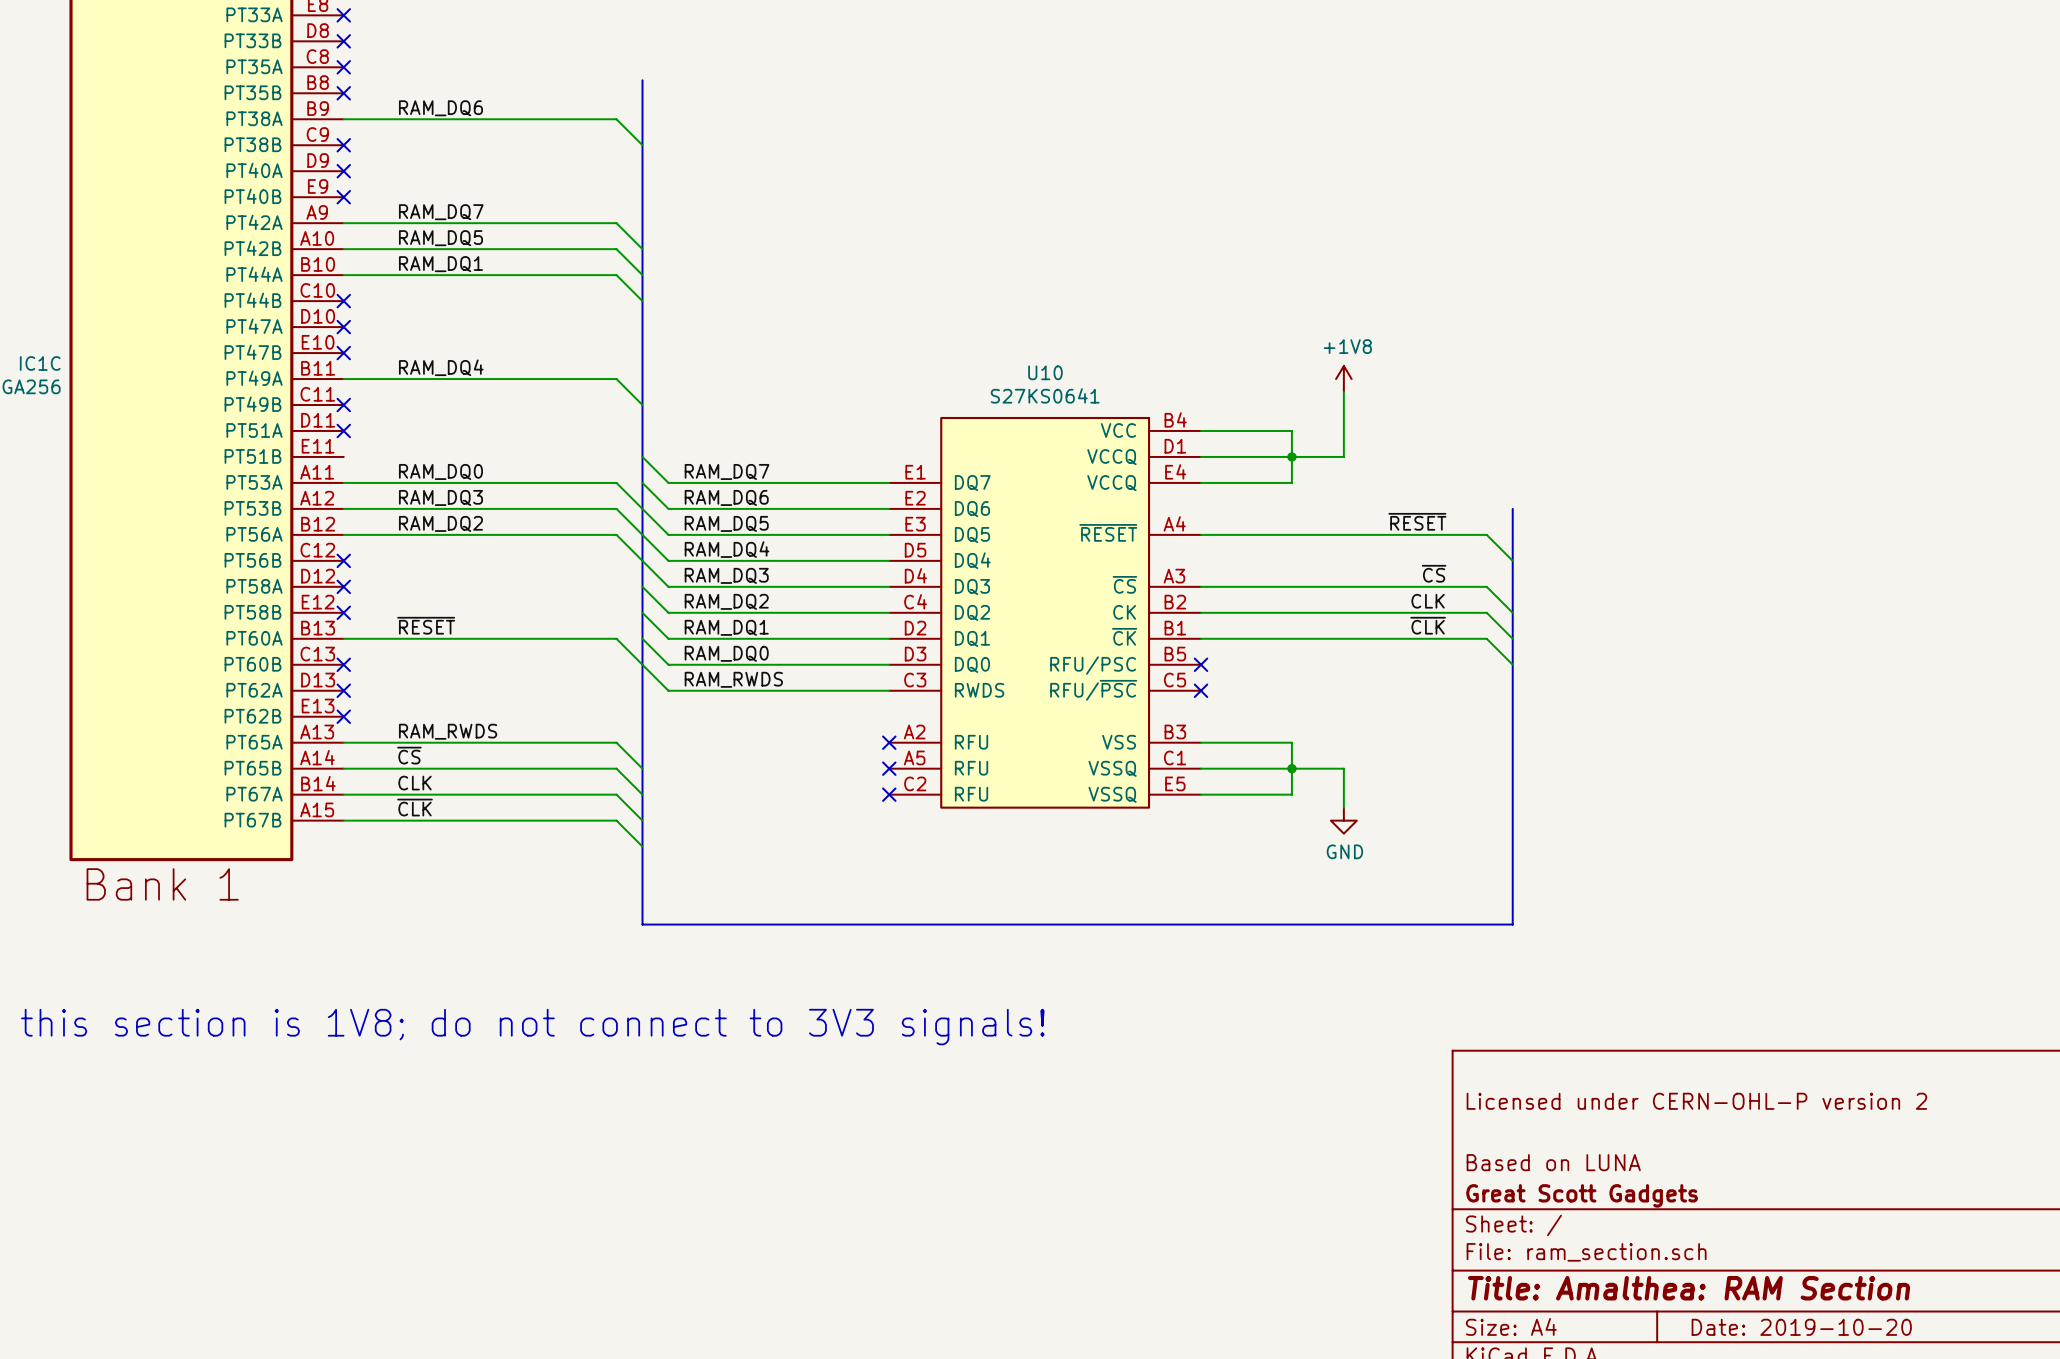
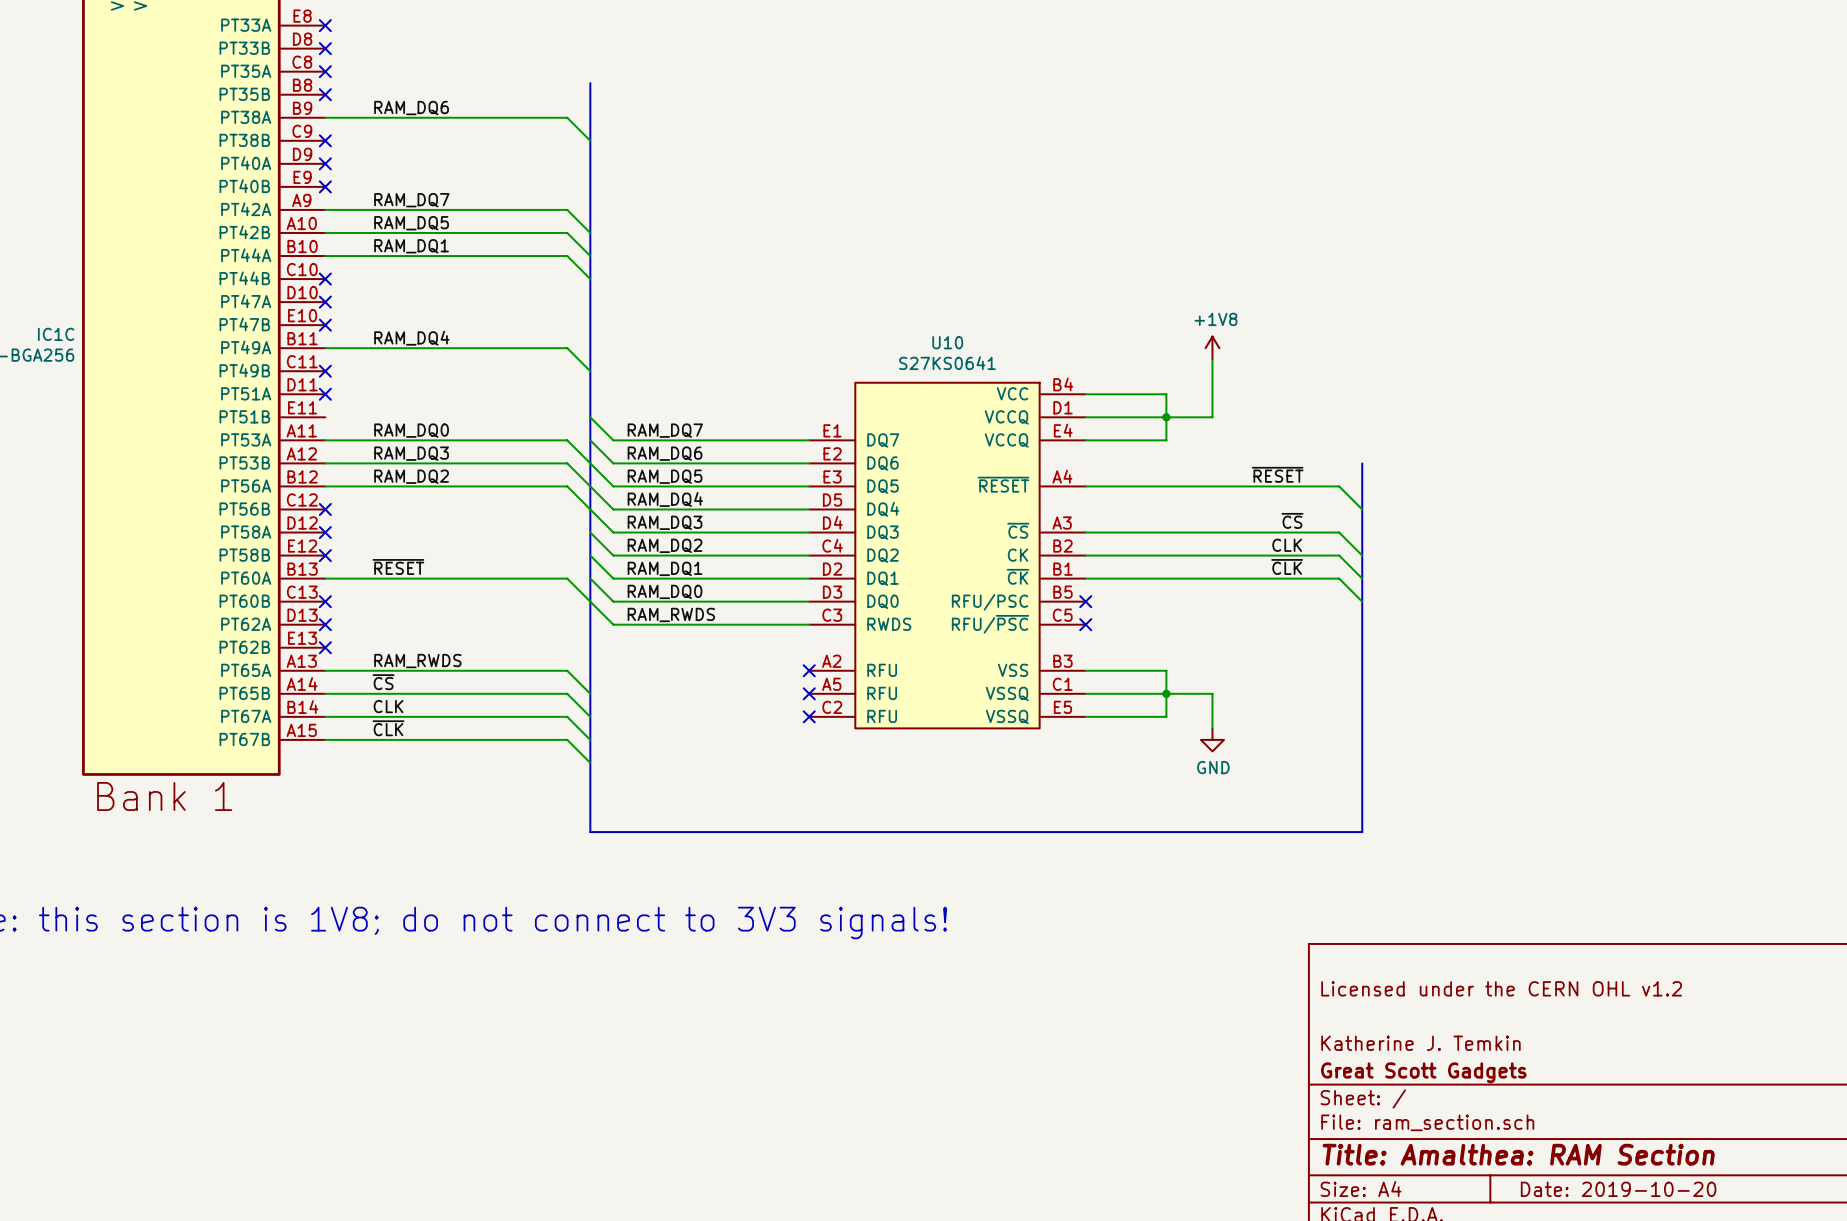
title block: Licensed under CERN-OHL-P version 2 (1696, 1101) -> Licensed under the CERN OHL v1.2 (1501, 988)
title block: Based on LUNA (1553, 1162) -> Katherine J. Temkin (1420, 1043)

